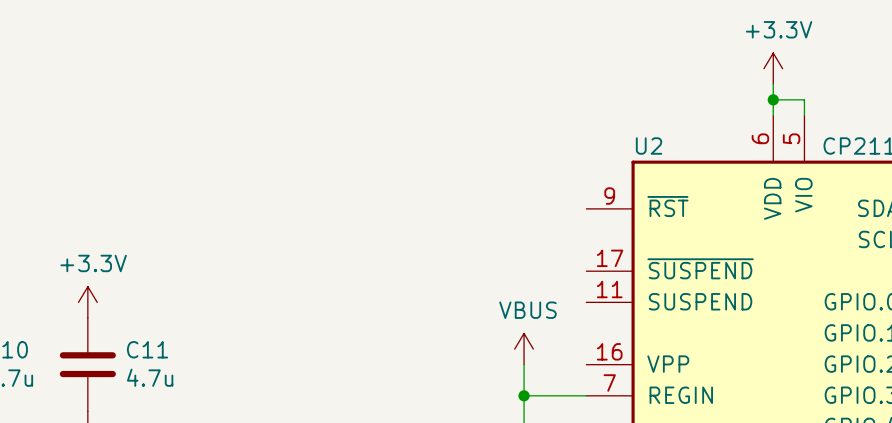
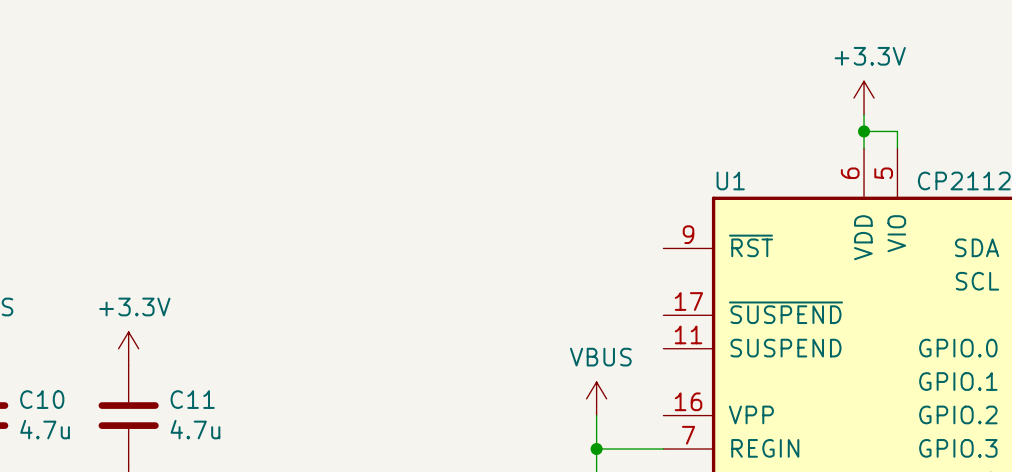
U2 name: U2 (649, 146) -> U1 (730, 180)

